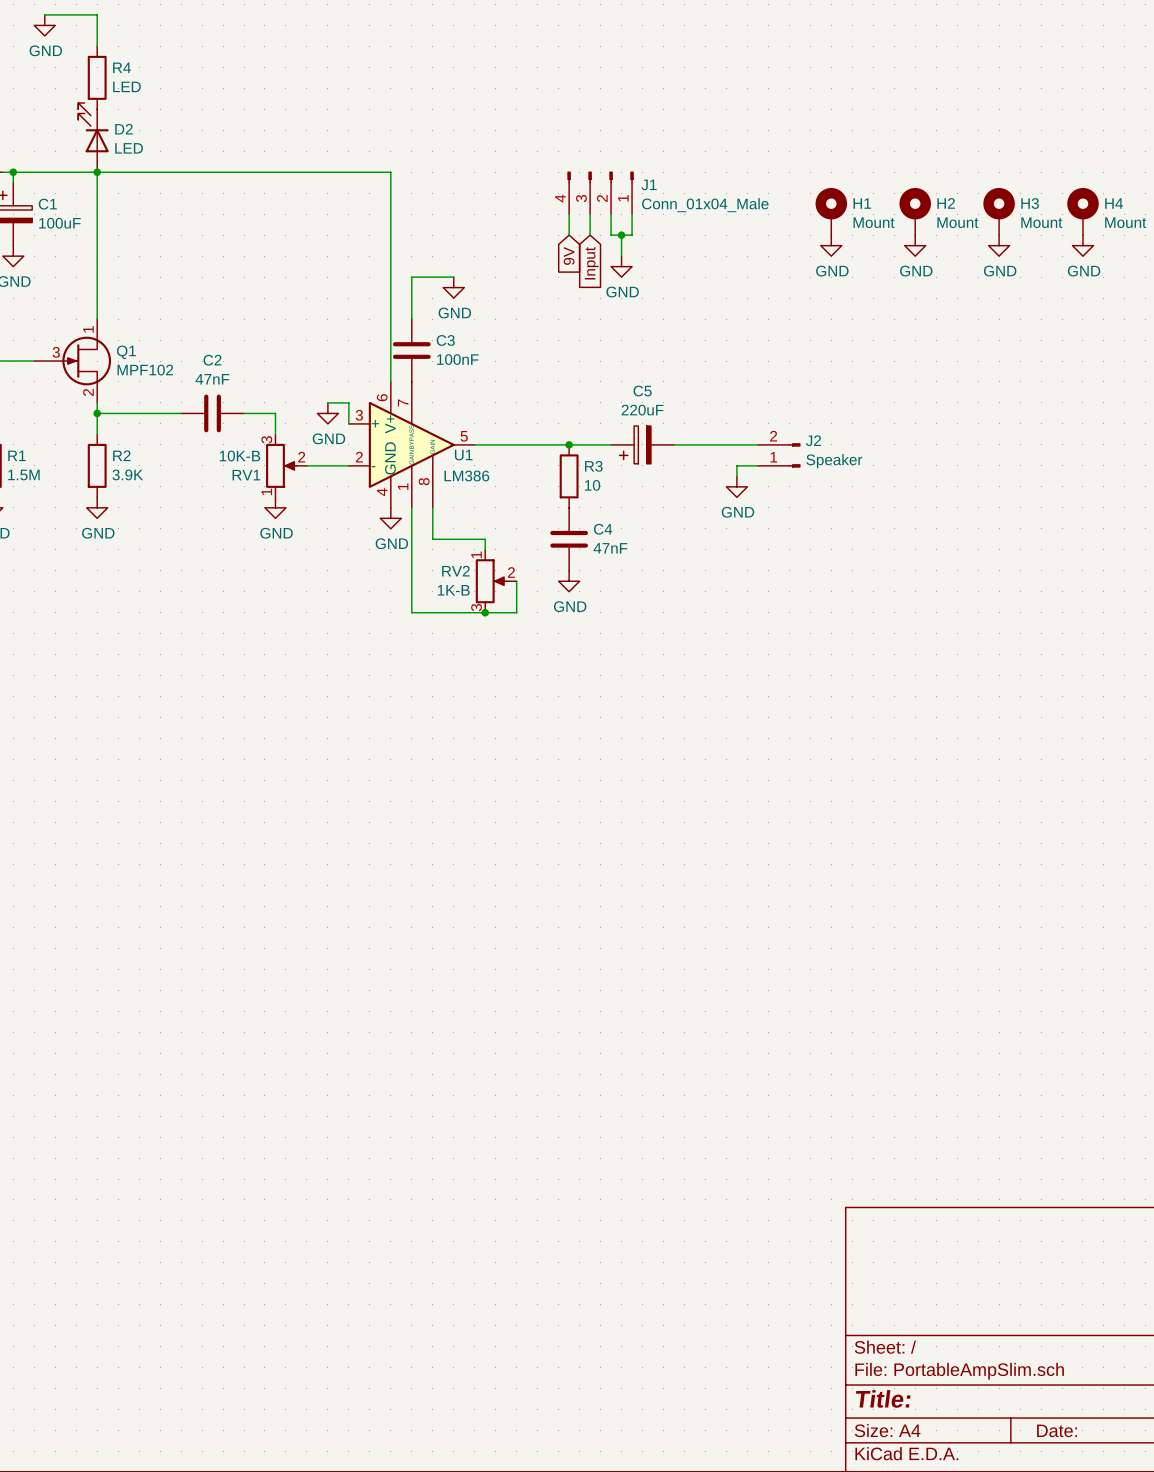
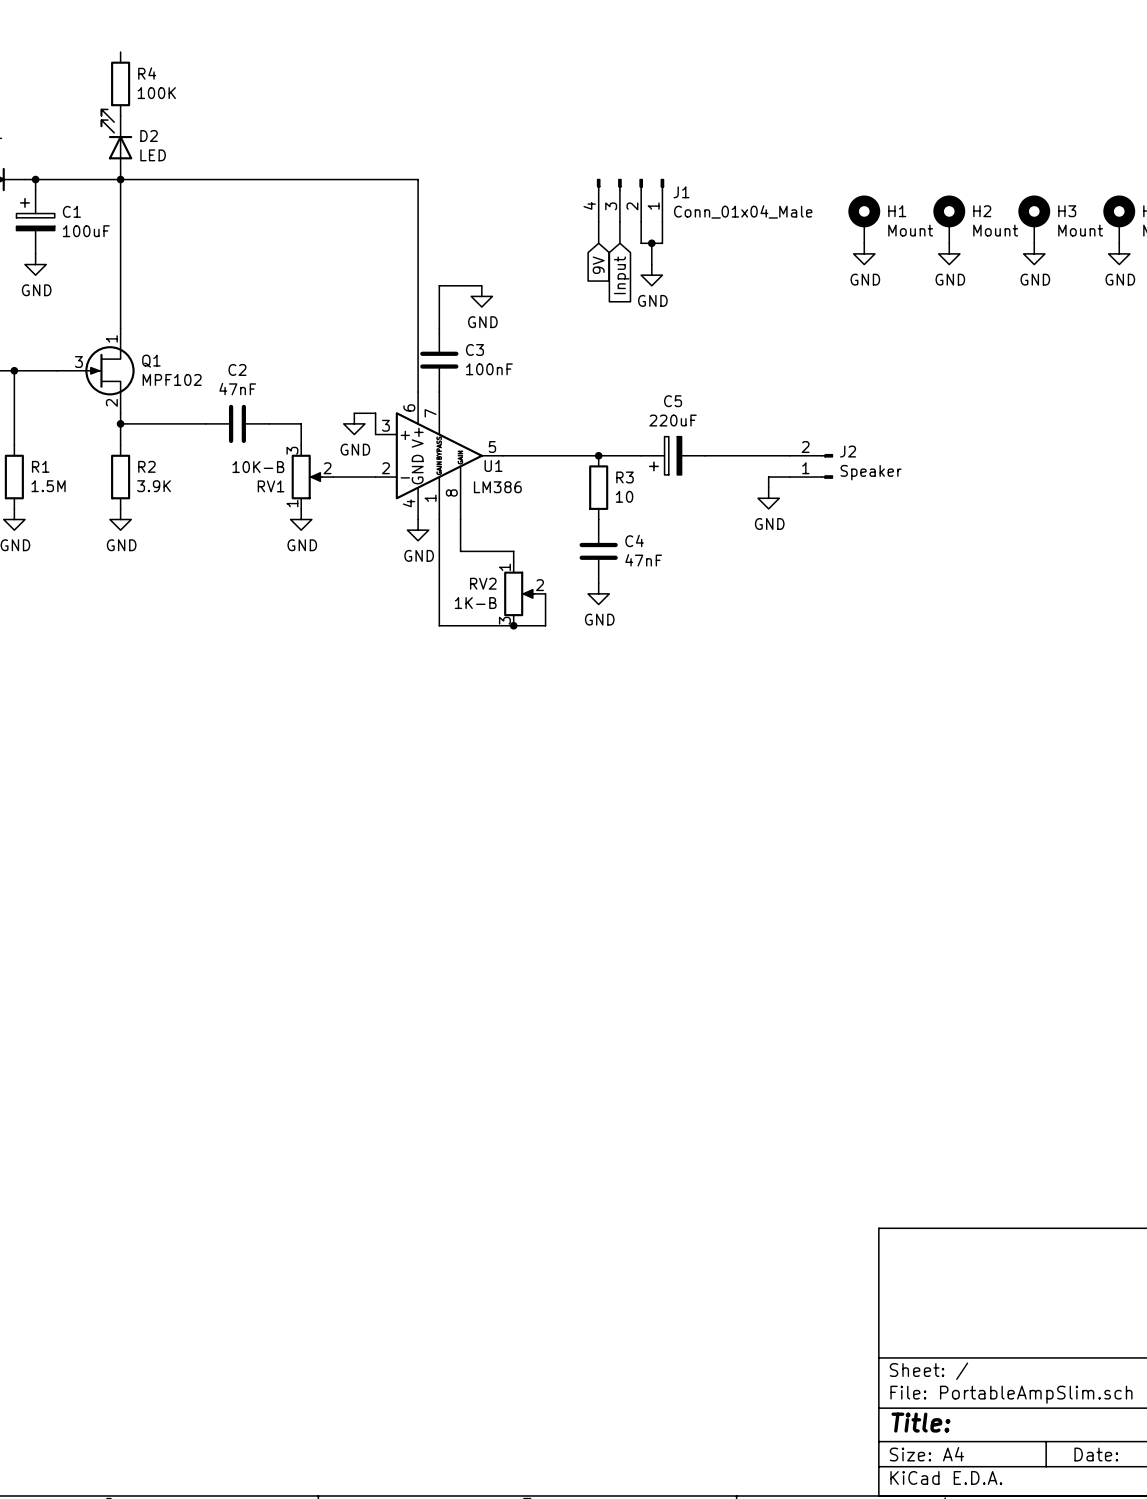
wire: (44, 14) (97, 14) (97, 46) -> none
power symbol: GND (44, 25) -> none
R4 value: LED (126, 86) -> 100K (156, 93)

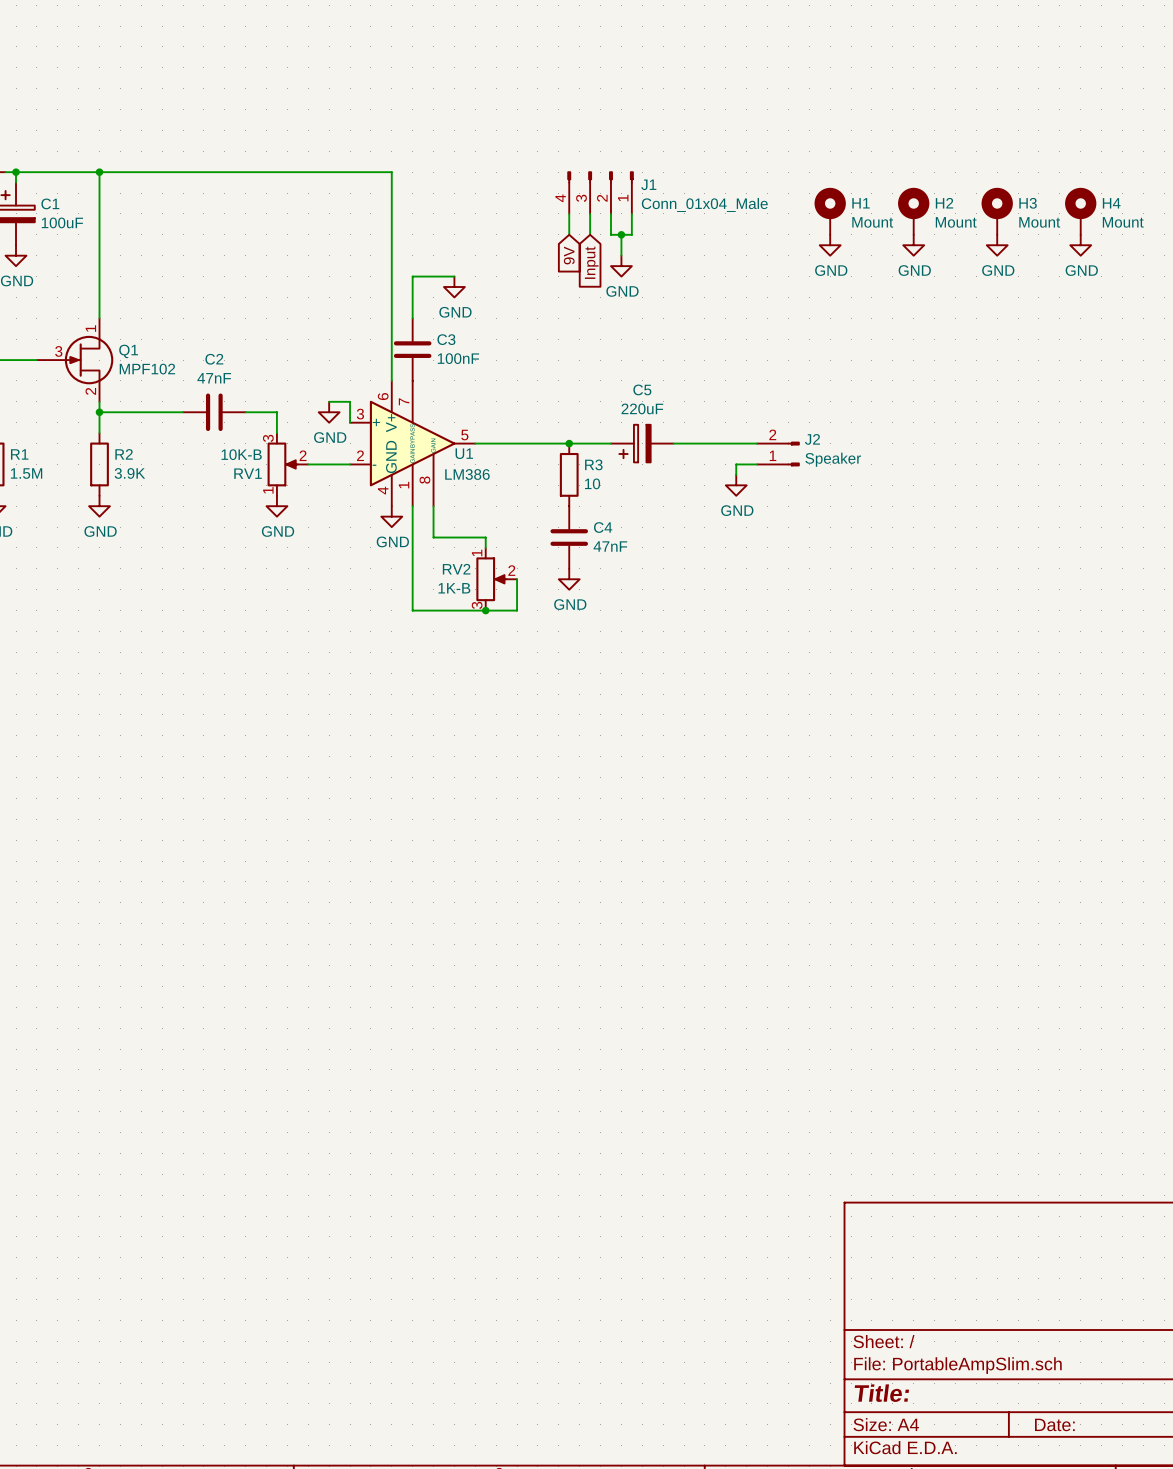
R4: 100K (120, 83) -> none
D2: LED (116, 144) -> none

